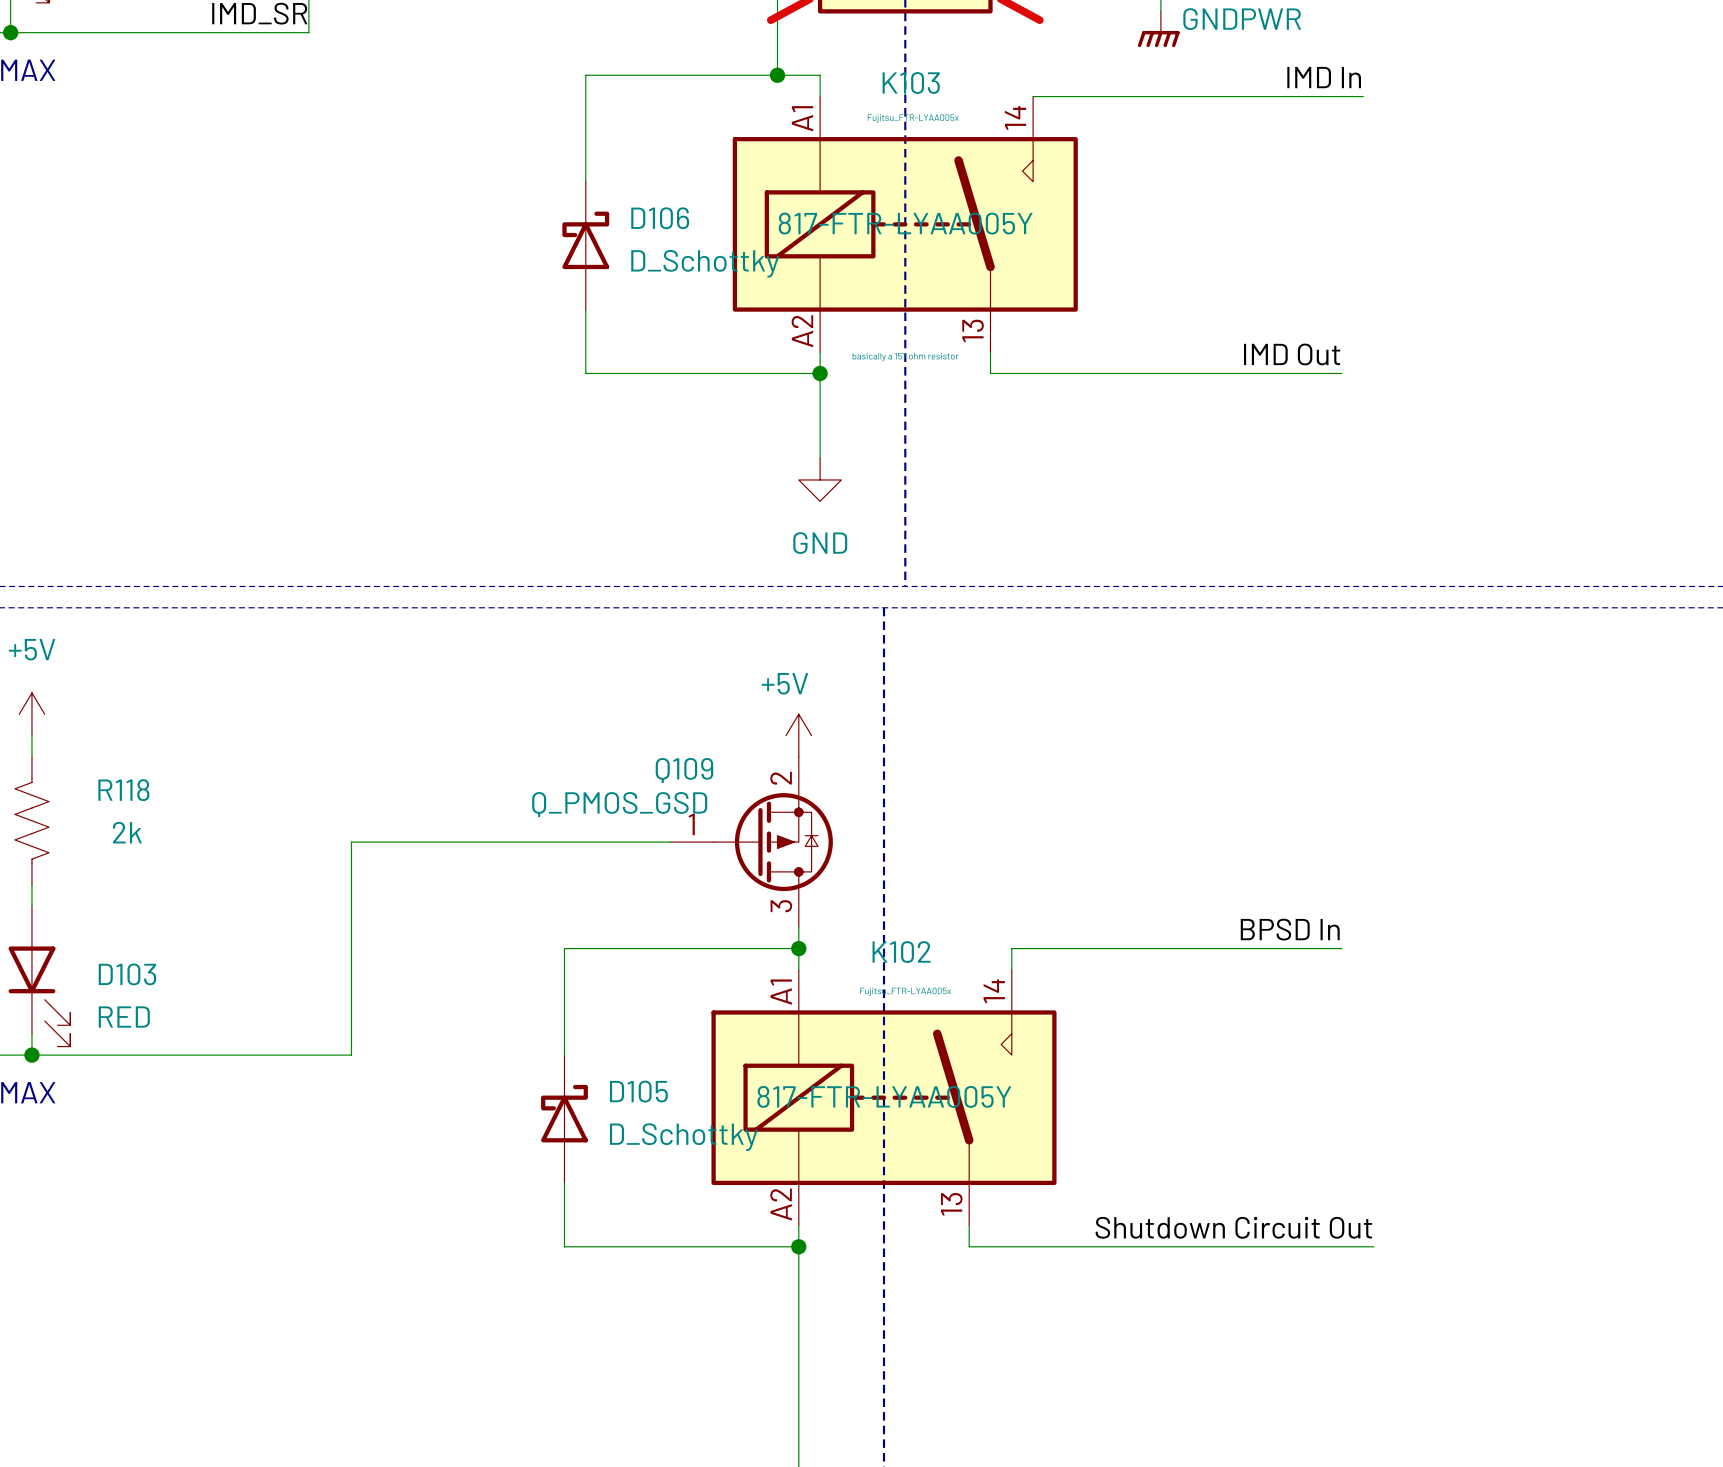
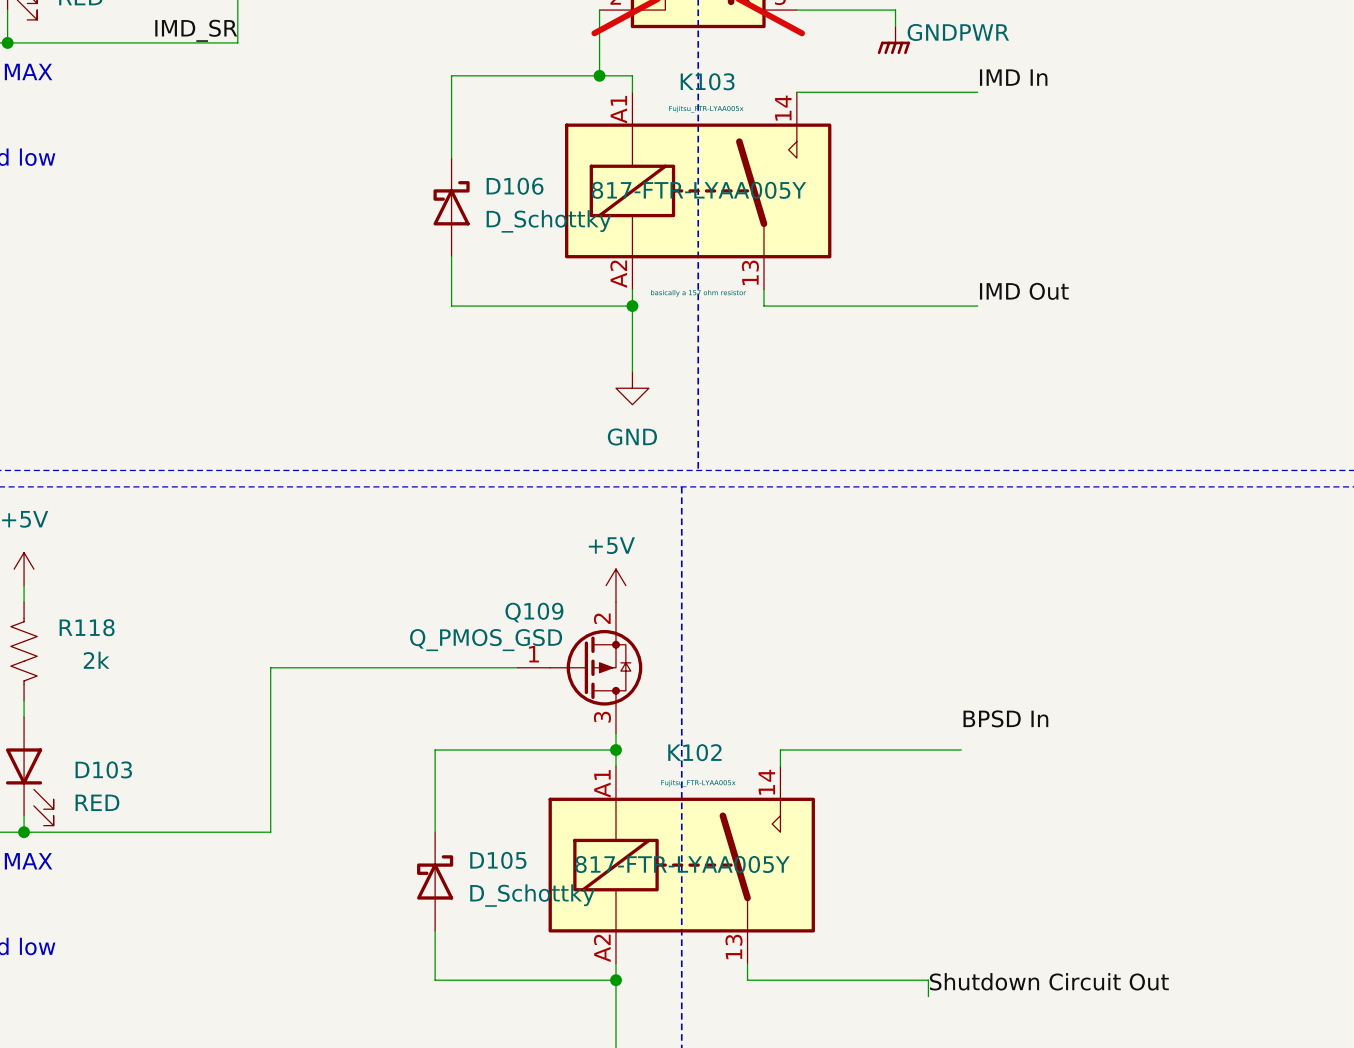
label position: IMD In (1324, 77) -> IMD In (1013, 77)
wire: (1267, 96) (1363, 96) -> none
label position: IMD Out (1292, 354) -> IMD Out (1024, 291)
wire: (1267, 373) (1341, 373) -> none
label position: BPSD In (1290, 929) -> BPSD In (1005, 718)
wire: (1246, 948) (1341, 948) -> none
label position: Shutdown Circuit Out (1233, 1227) -> Shutdown Circuit Out (1049, 981)
wire: (1203, 1246) (1373, 1246) -> (928, 980) (928, 996)

